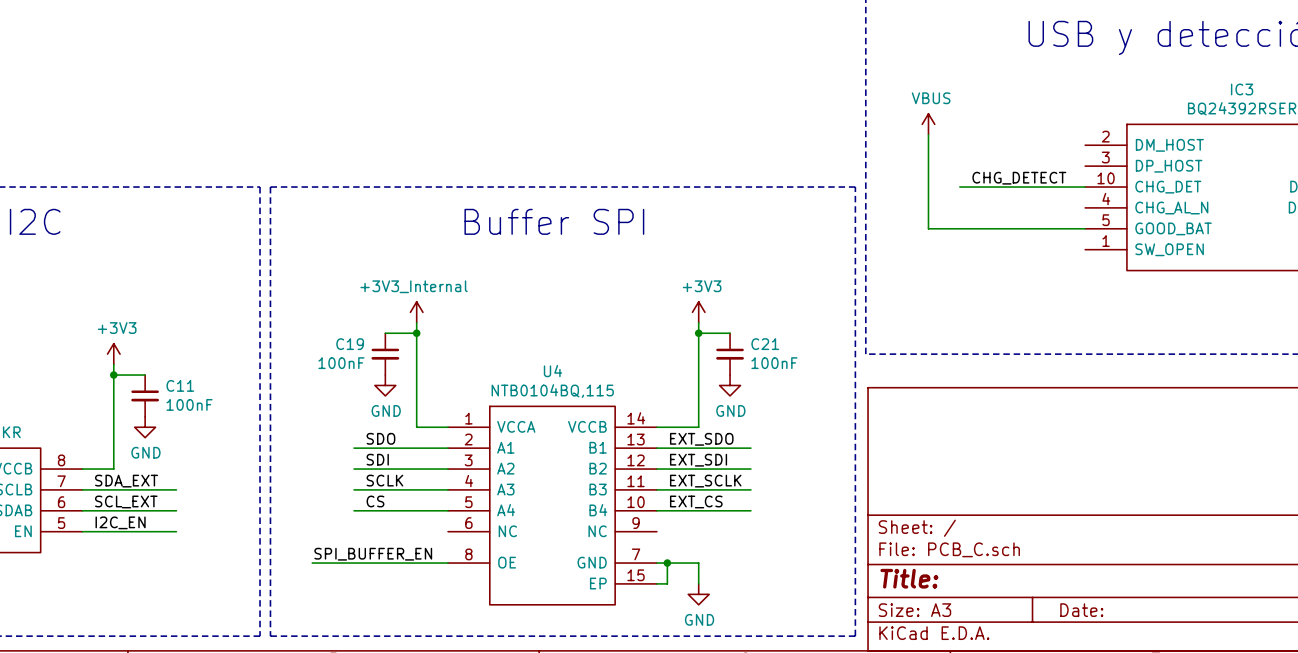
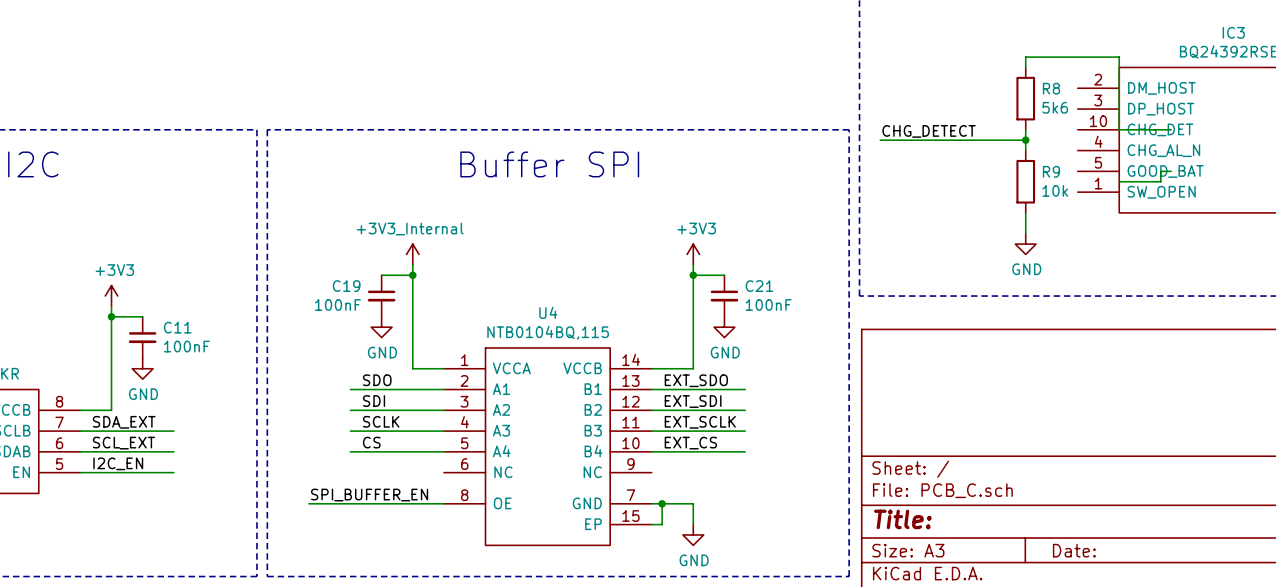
power symbol: VBUS (928, 124) -> none
wire: none -> (1025, 67) (1025, 57) (1119, 57) (1119, 129) (1171, 129)
wire: (928, 134) (928, 228) (1085, 228) -> none
R8: none -> 5k6 (1025, 98)
label position: CHG_DETECT (1019, 178) -> CHG_DETECT (929, 131)
wire: (959, 187) (1085, 187) -> none
wire: none -> (1025, 129) (1025, 150)
wire: none -> (880, 140) (1025, 140)
junction: none -> (1025, 140)
wire: none -> (1171, 171) (1160, 171) (1160, 181) (1119, 181)
R9: none -> 10k (1025, 181)
wire: none -> (1025, 212) (1025, 233)
power symbol: none -> GND (1025, 244)

